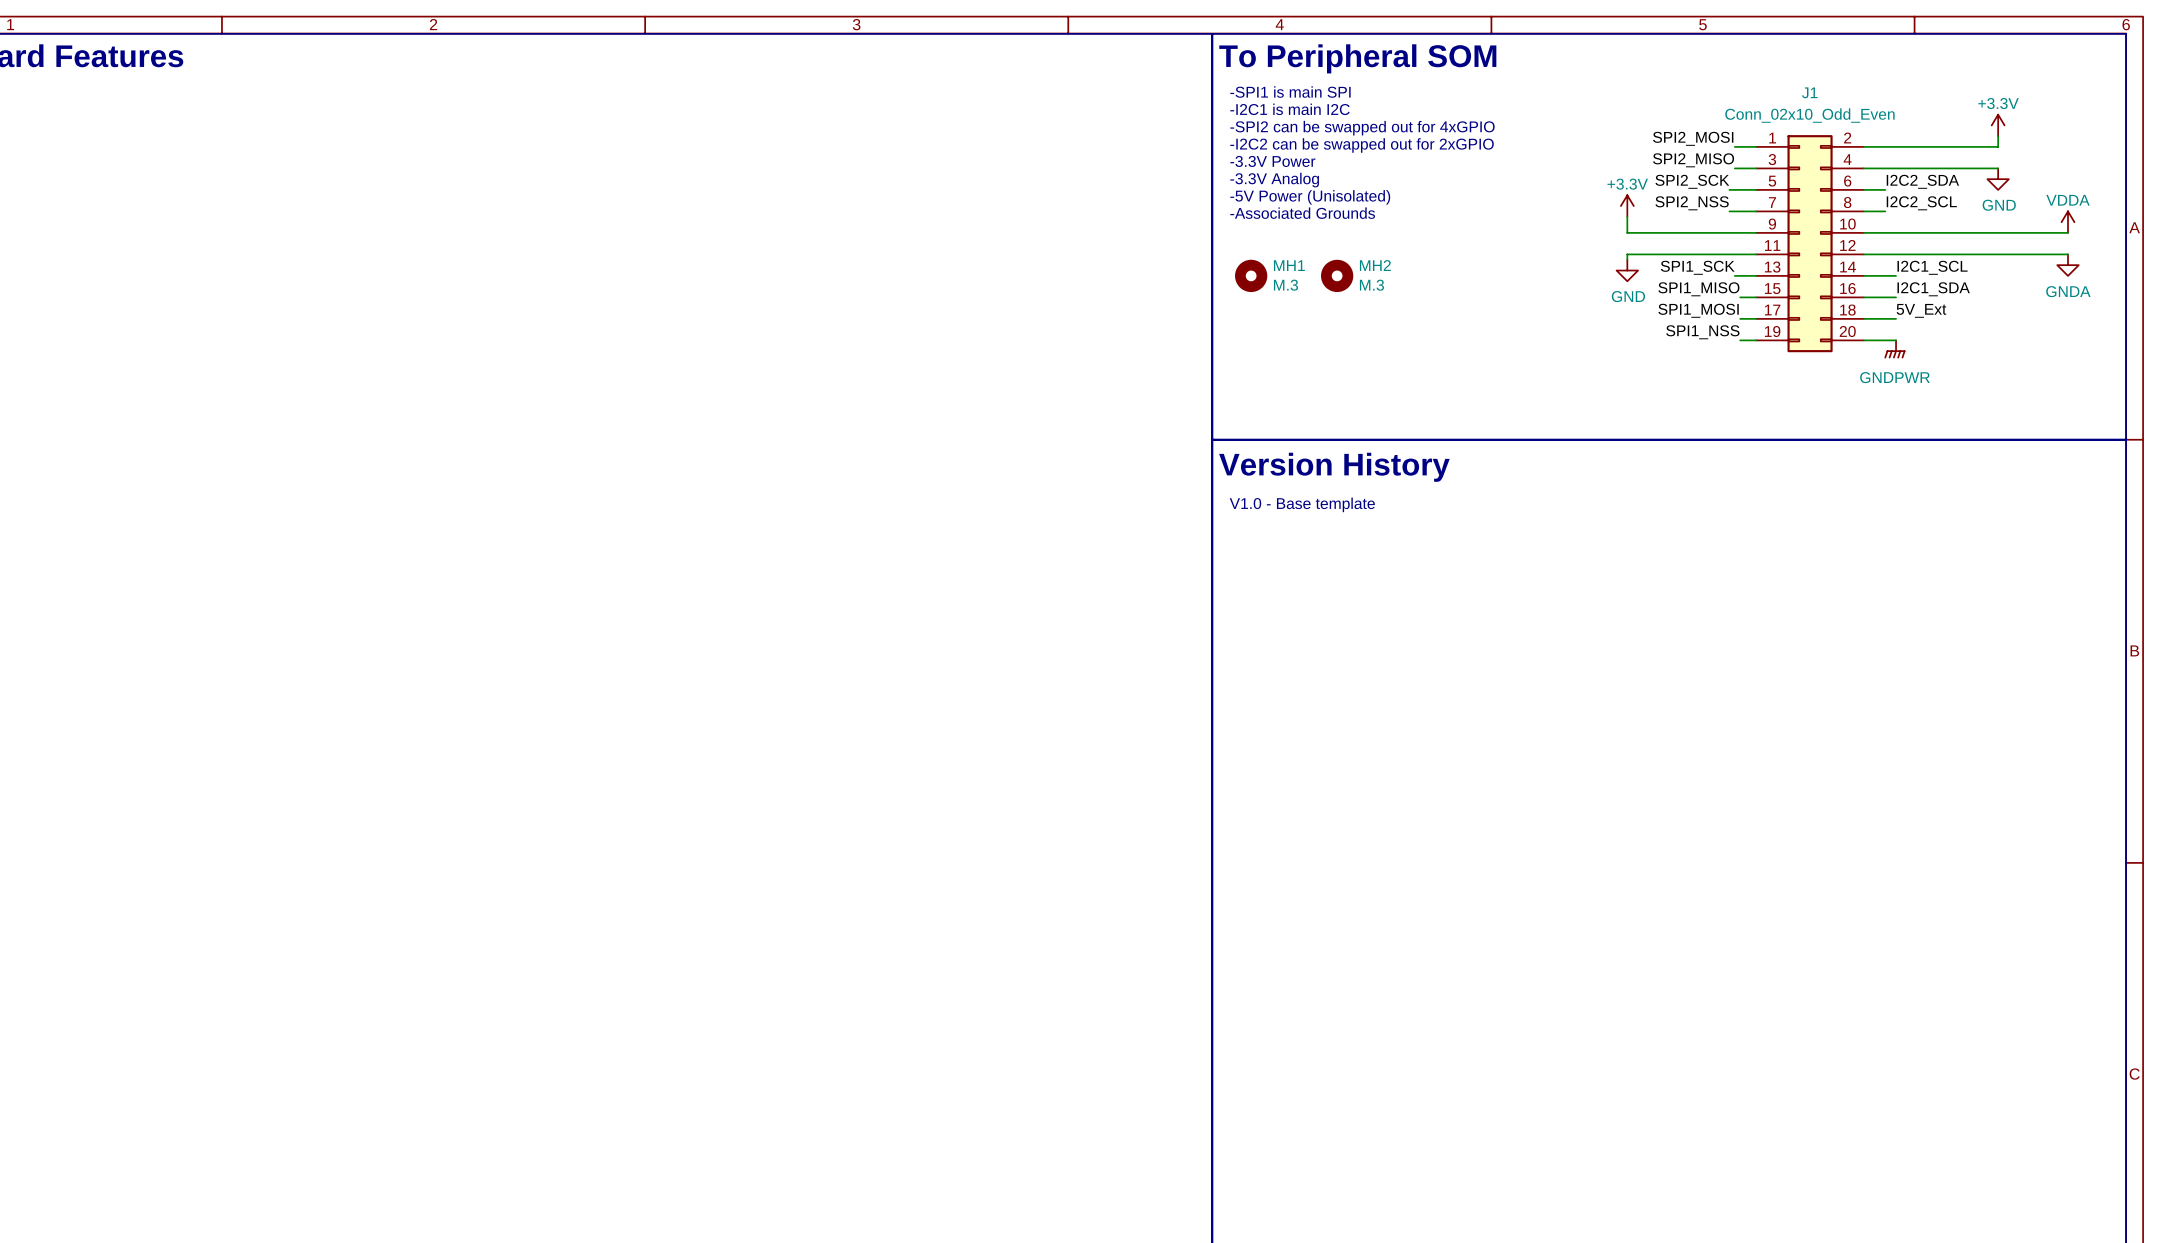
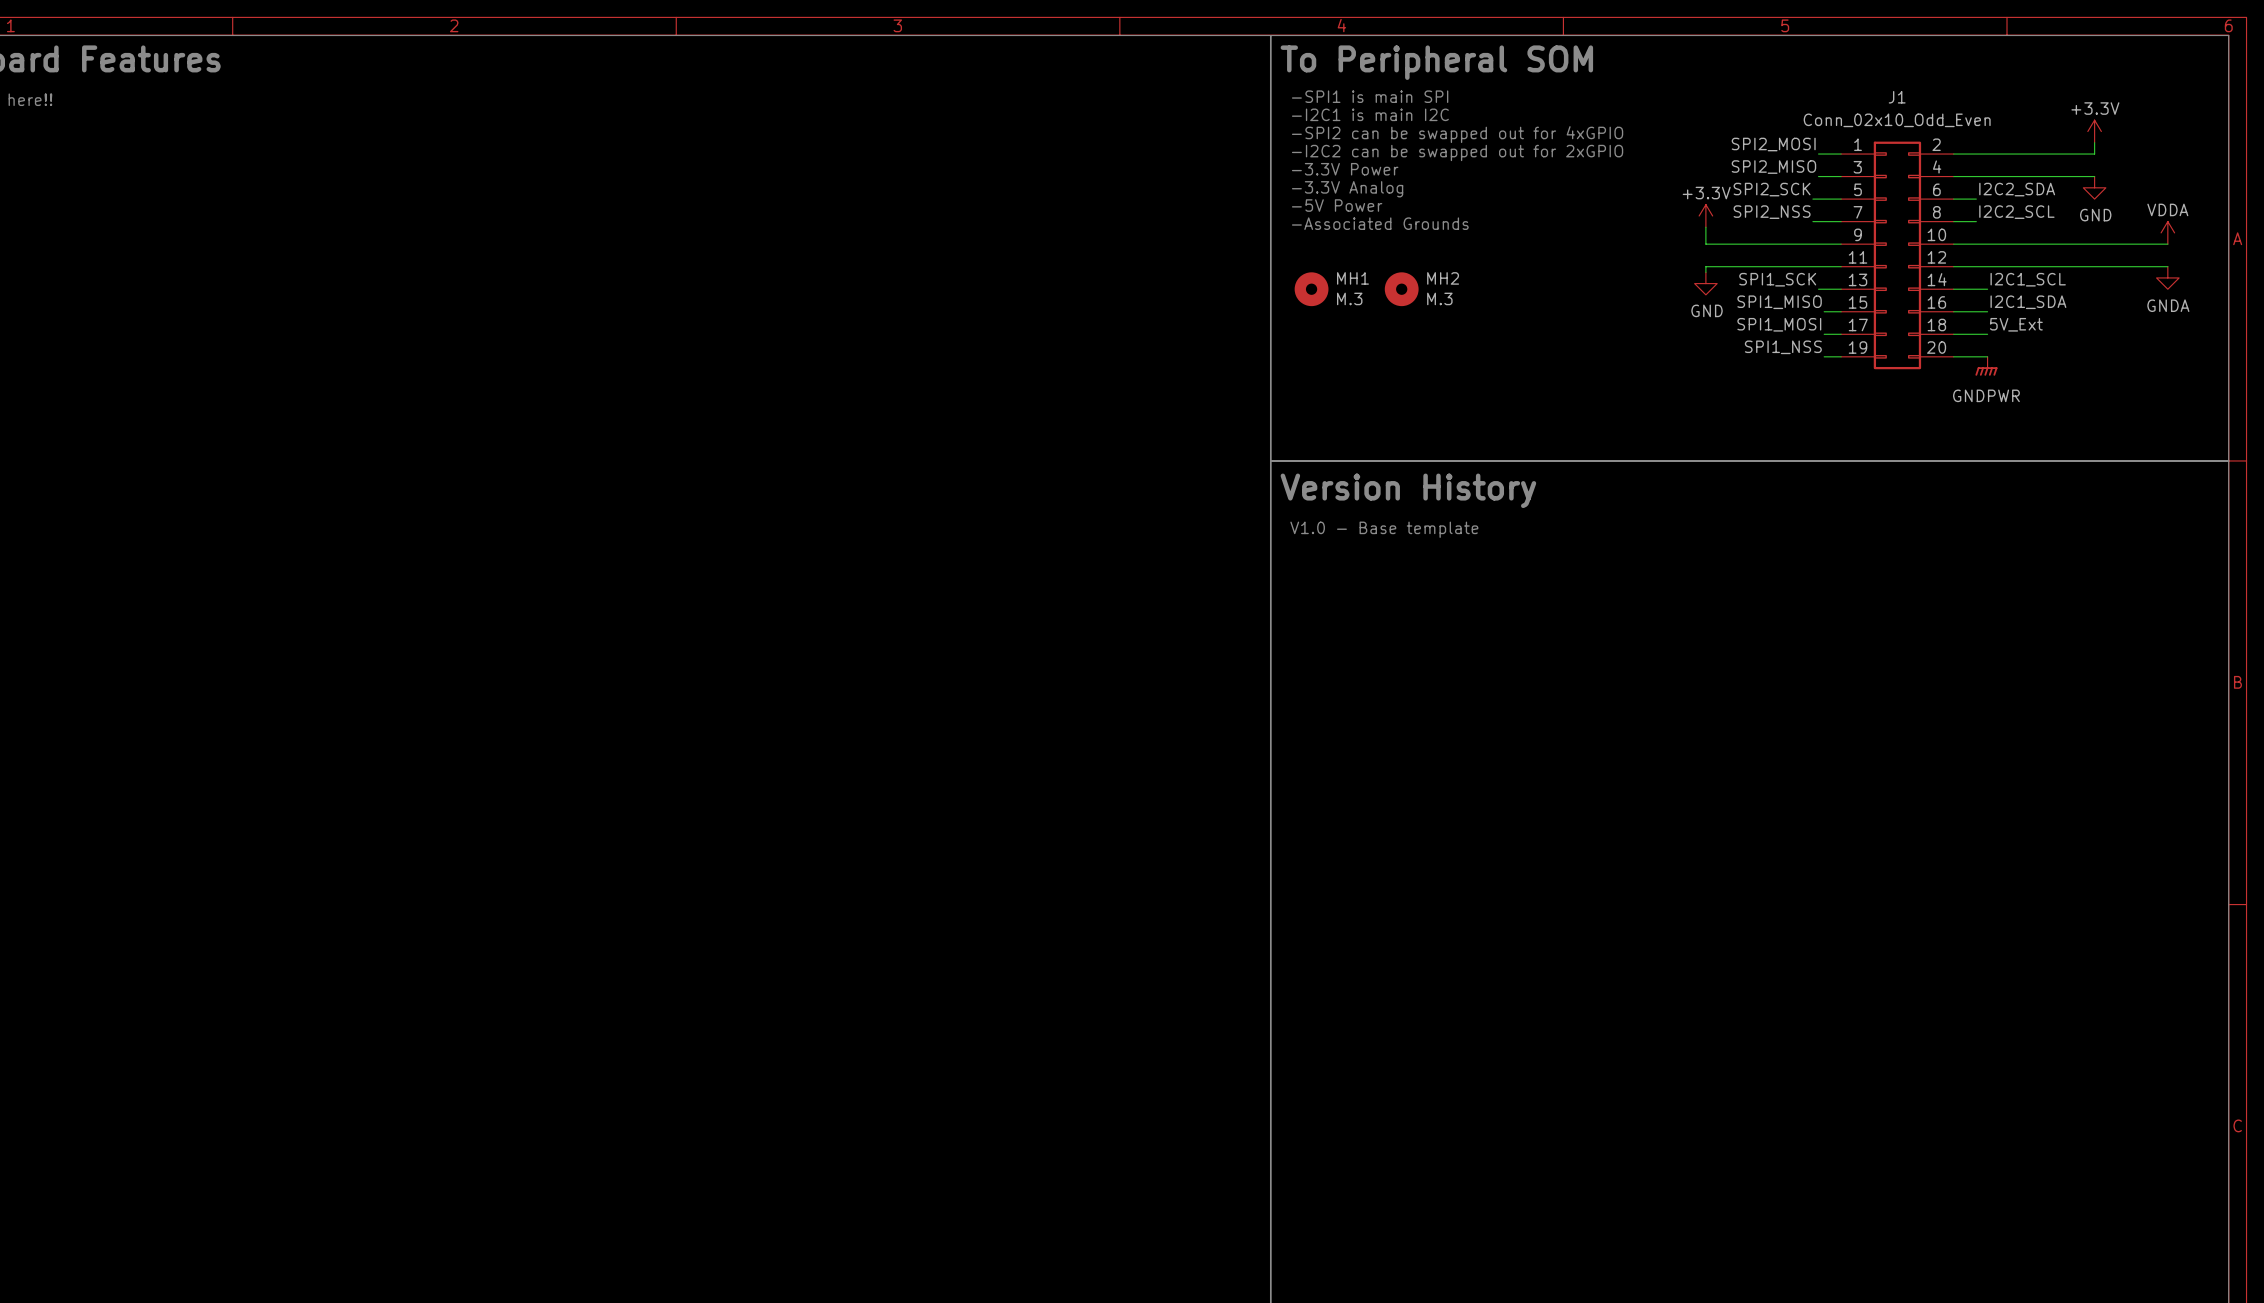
text: -5V Power (Unisolated) (1310, 197) -> -5V Power (1337, 205)

